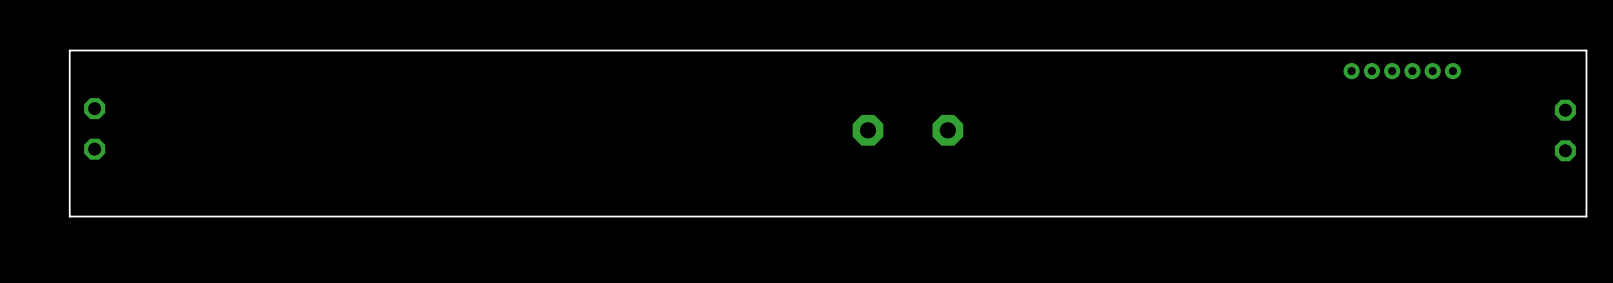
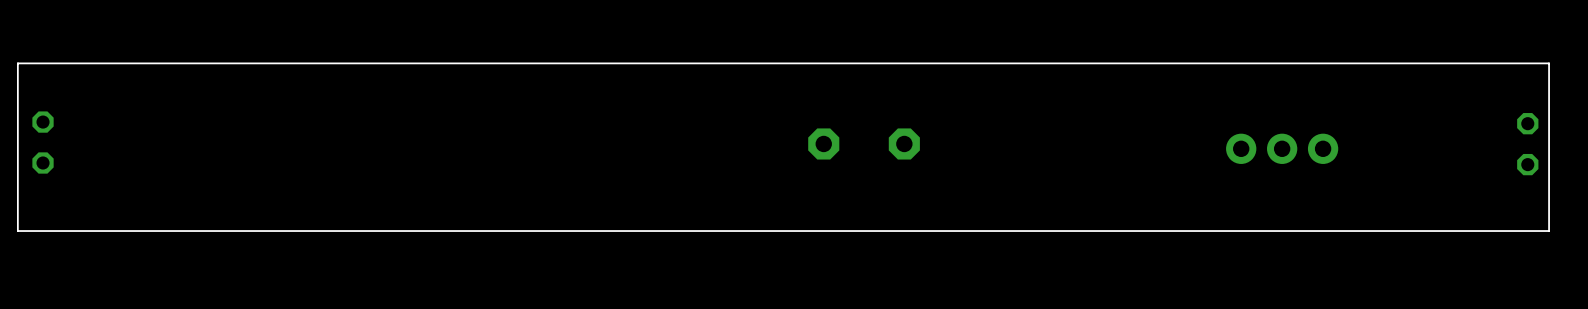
part: (1402, 71) -> none
part: none -> (1282, 148)

